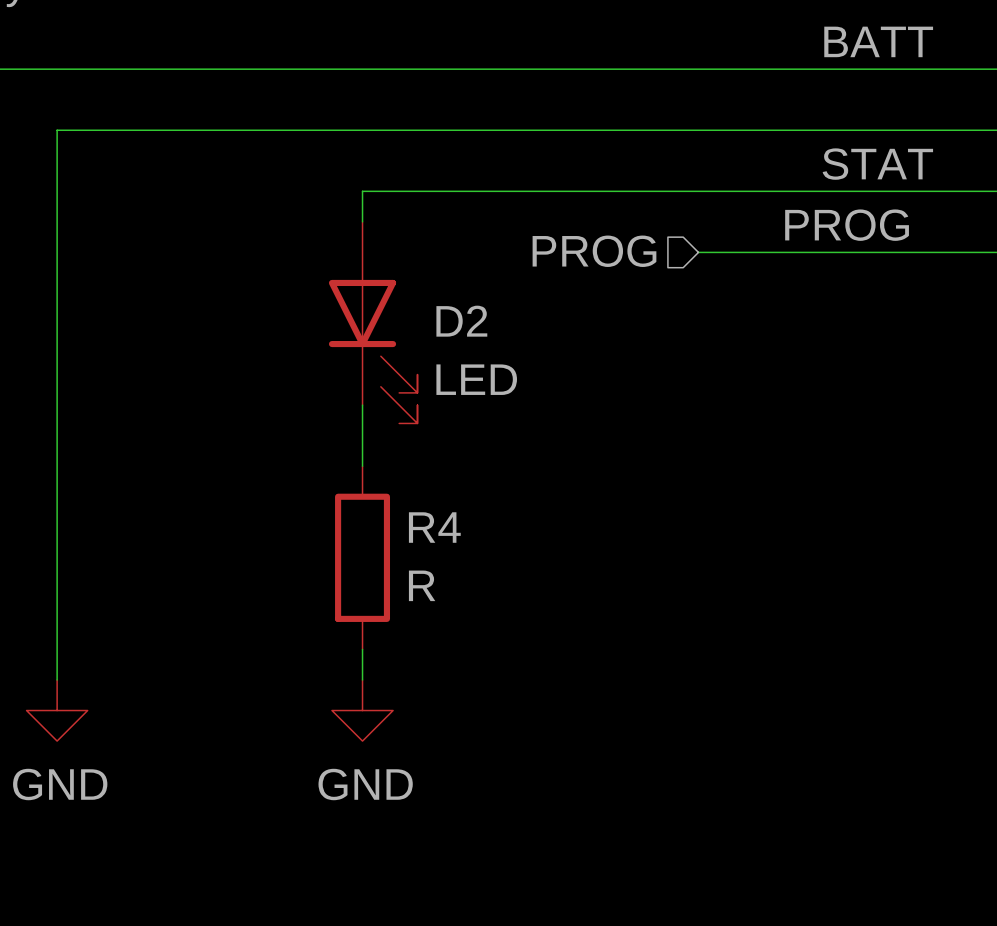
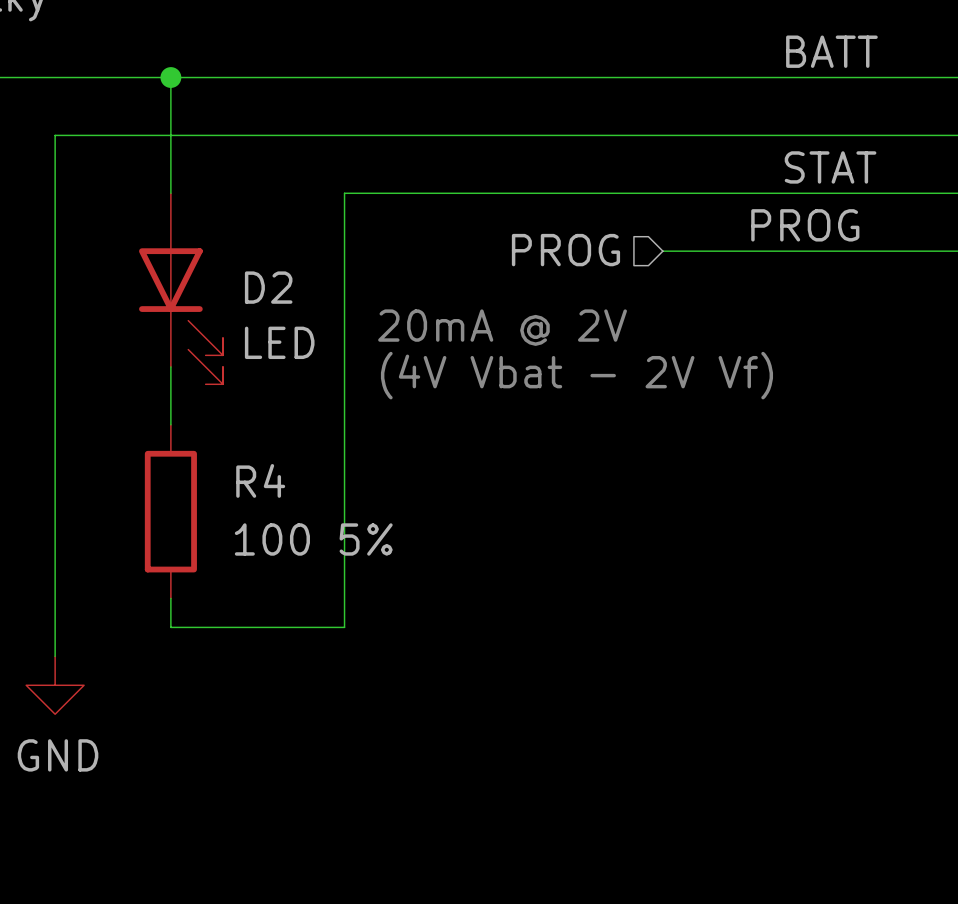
wire: none -> (170, 77) (170, 193)
junction: none -> (170, 77)
D2 position: (373, 322) -> (181, 288)
text: none -> 20mA @ 2V (502, 327)
wire: none -> (170, 366) (170, 424)
text: none -> (4V Vbat - 2V Vf) (576, 375)
wire: none -> (344, 453) (344, 627) (170, 627) (170, 598)
R4 name position: R4 (434, 527) -> R4 (260, 480)
R4 position: (362, 557) -> (170, 511)
R4 value: R (422, 585) -> 100 5% (313, 539)
wire: (362, 649) (362, 679) -> none
power symbol: GND (362, 710) -> none

